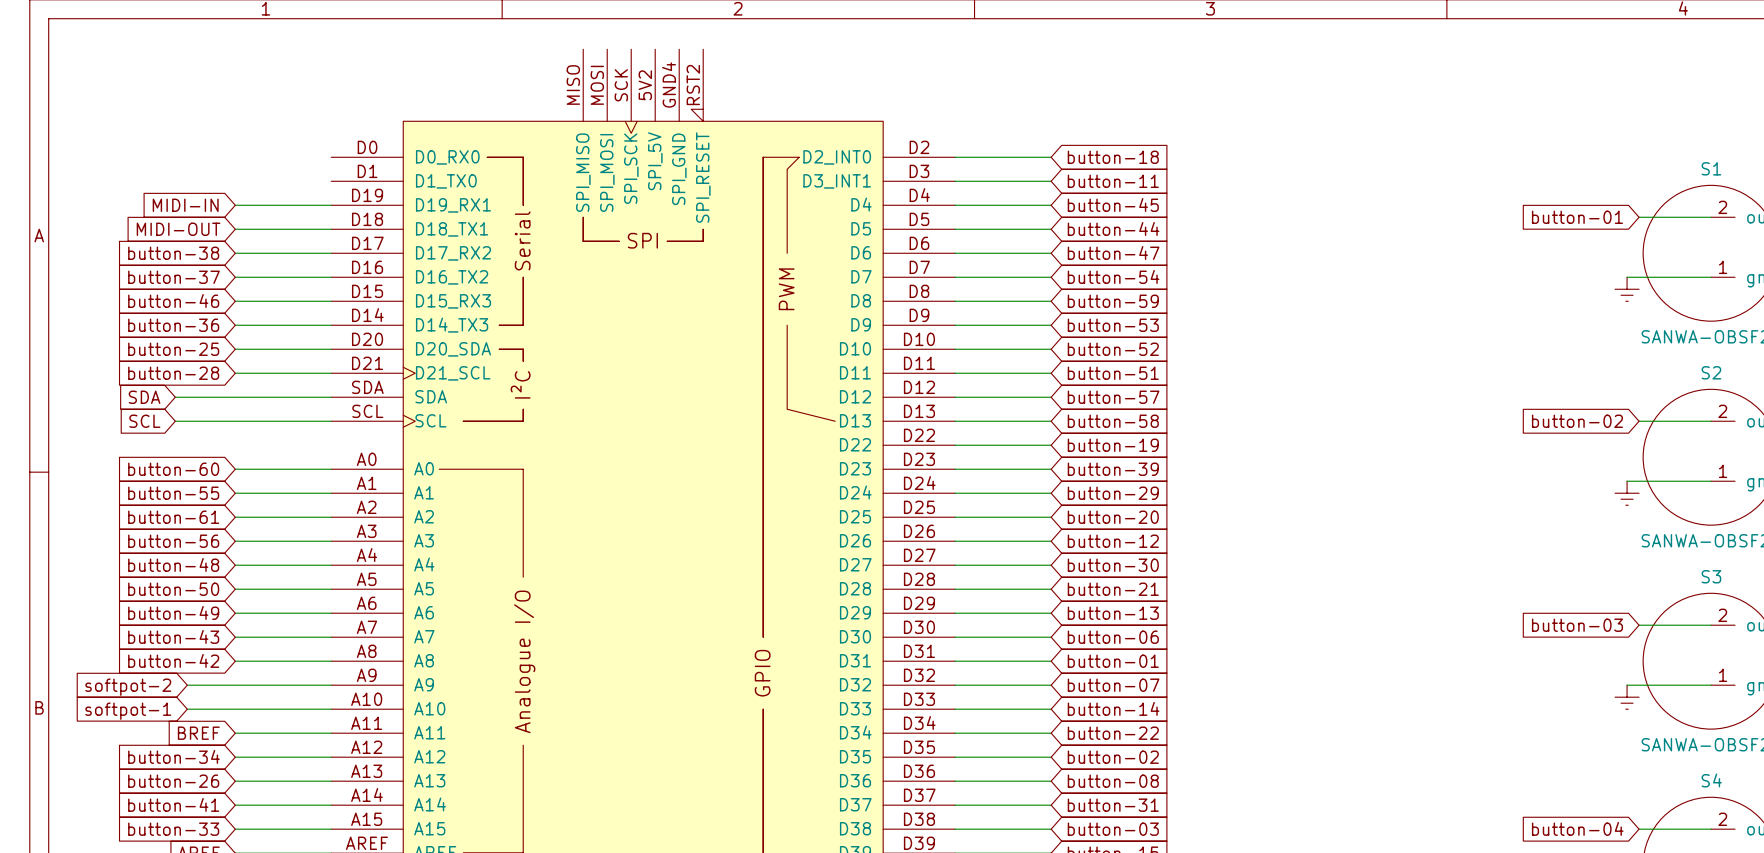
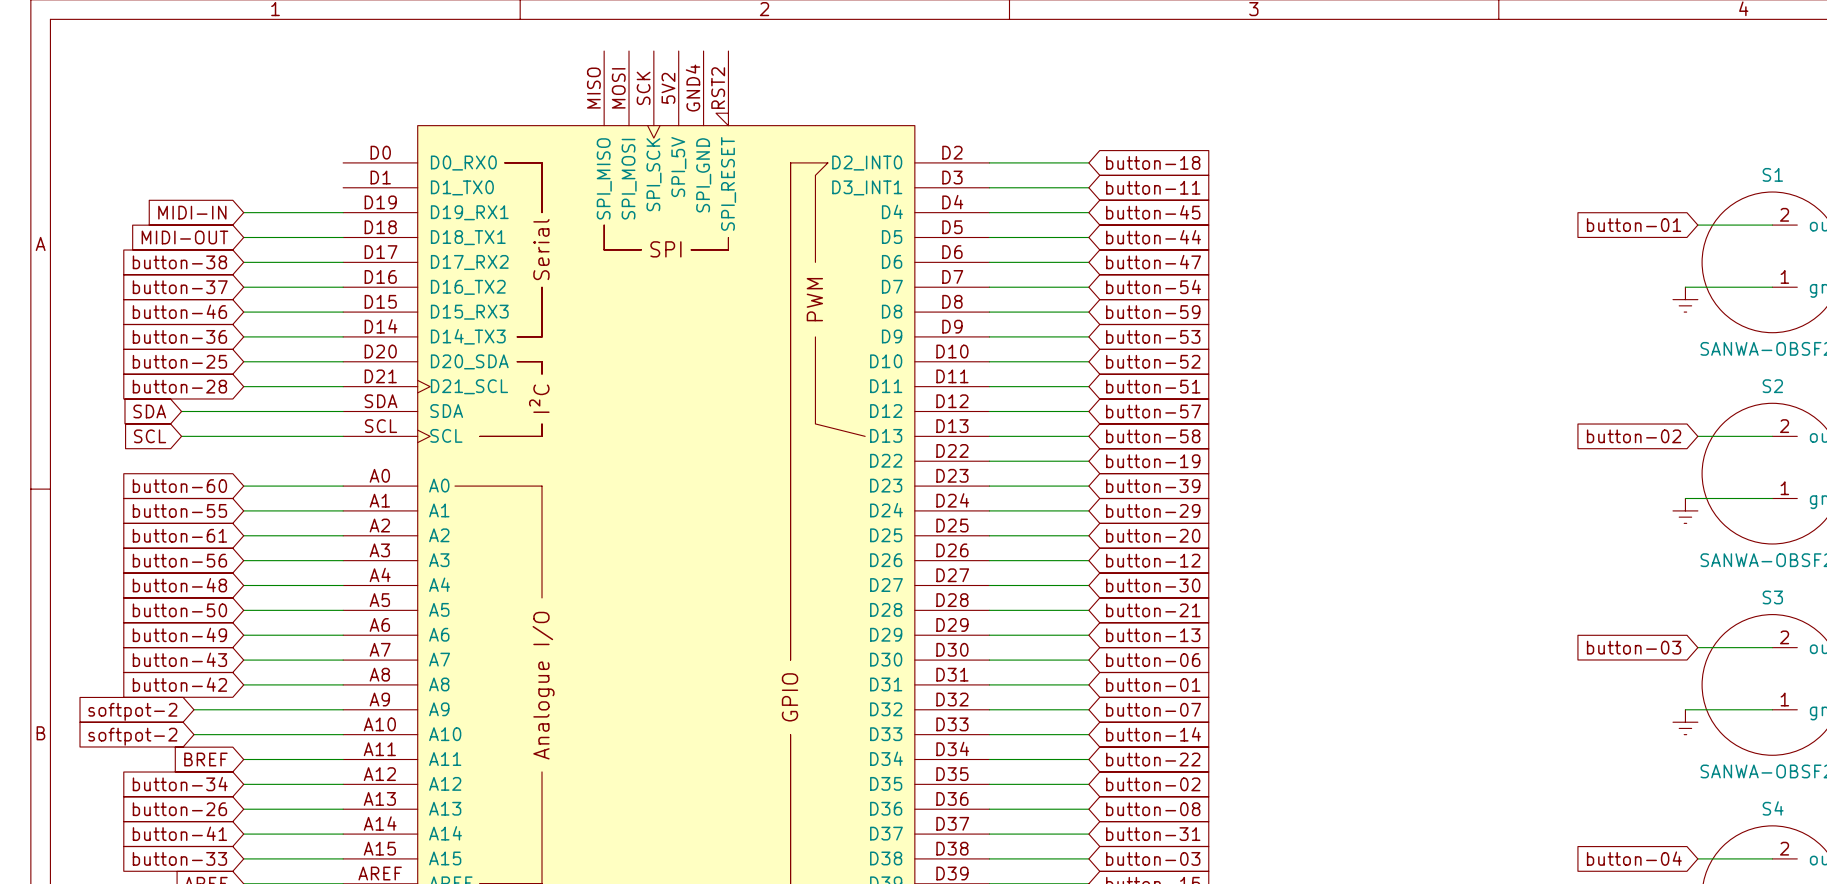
global label: softpot-1 (128, 711) -> softpot-2 (132, 736)

